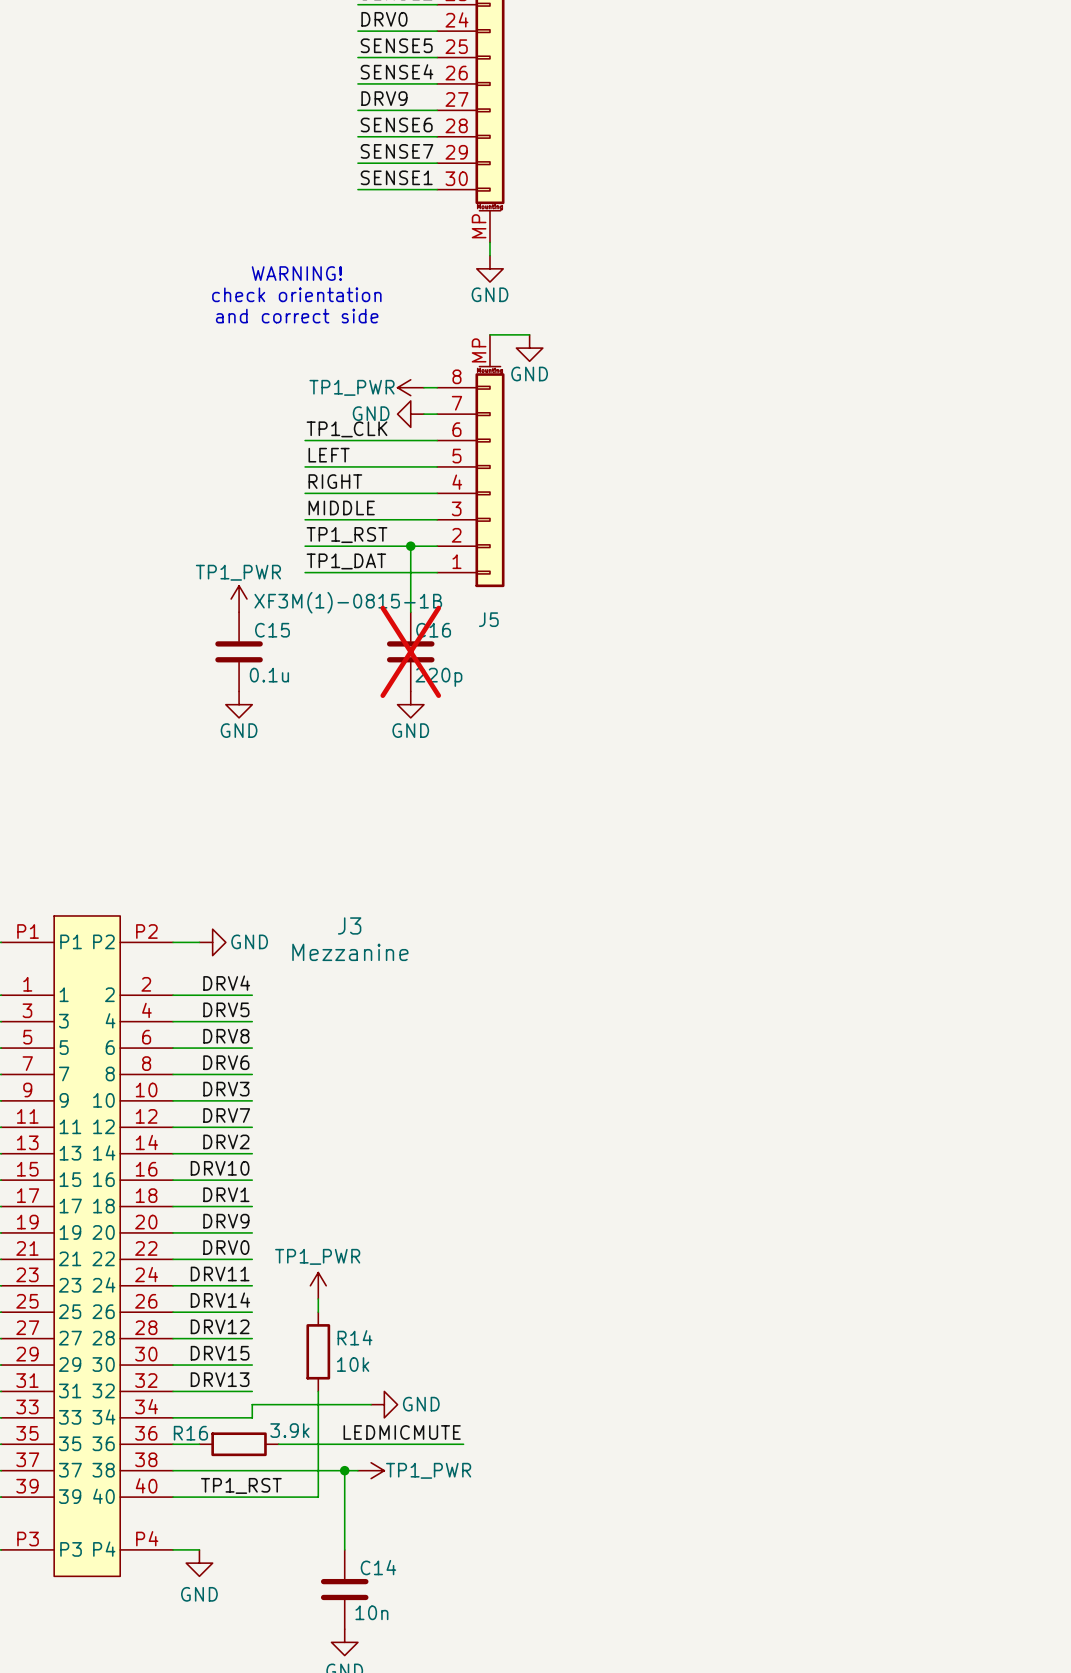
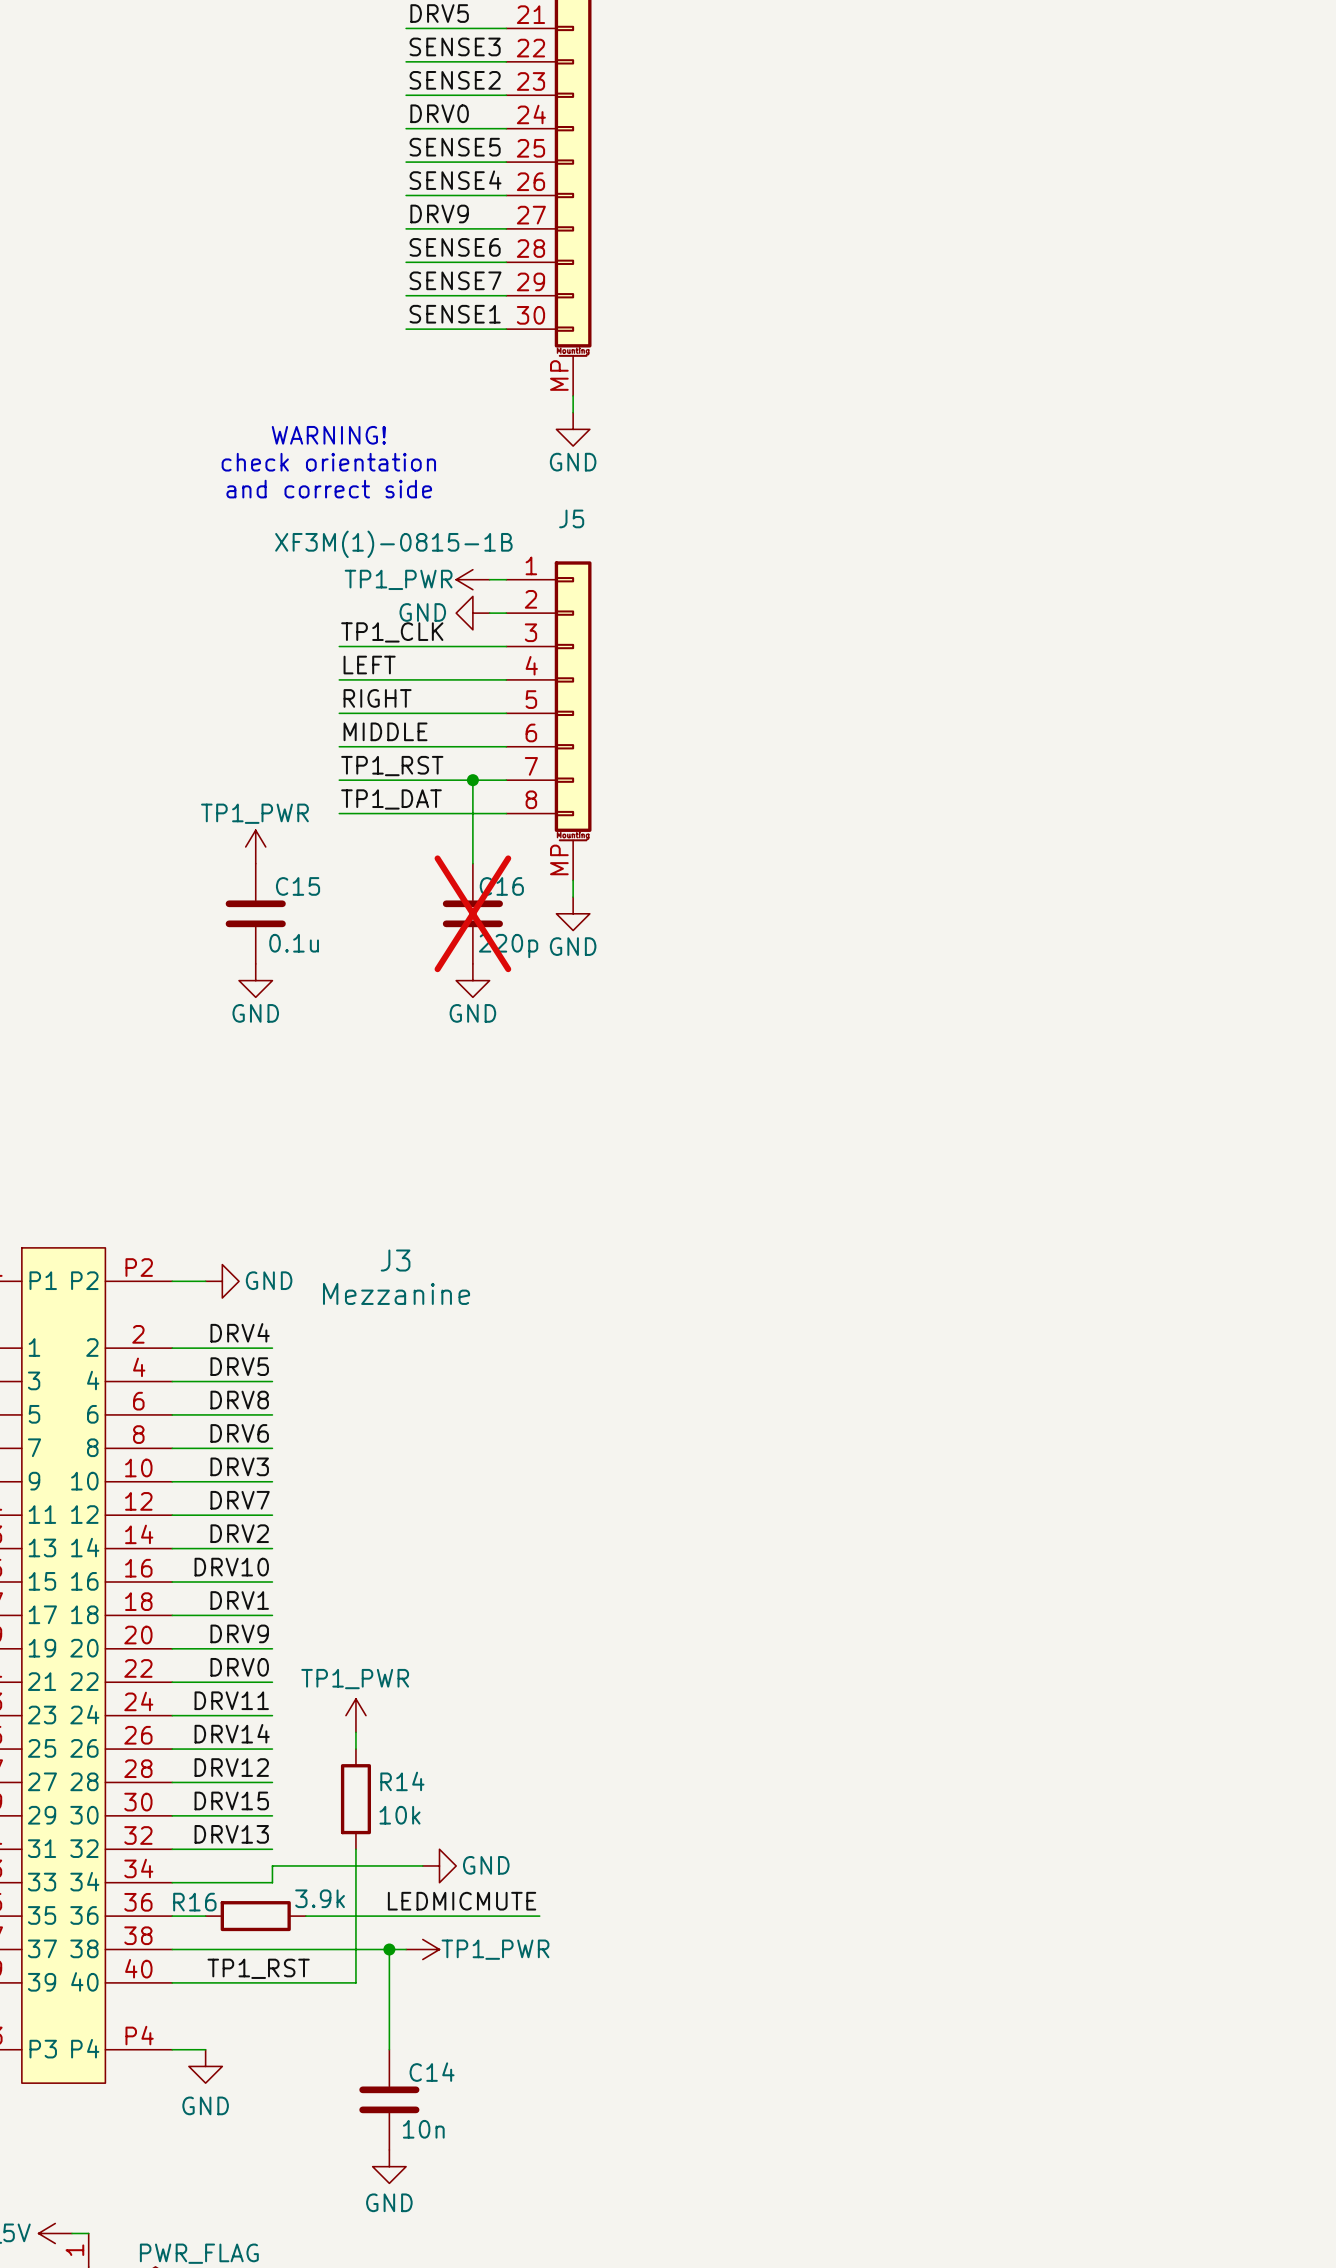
wire: (489, 334) (529, 334) -> none
power symbol: GND (529, 348) -> none
J5 flip: as is (489, 476) -> up-down (573, 701)
wire: none -> (573, 880) (573, 897)
power symbol: none -> GND (573, 913)

